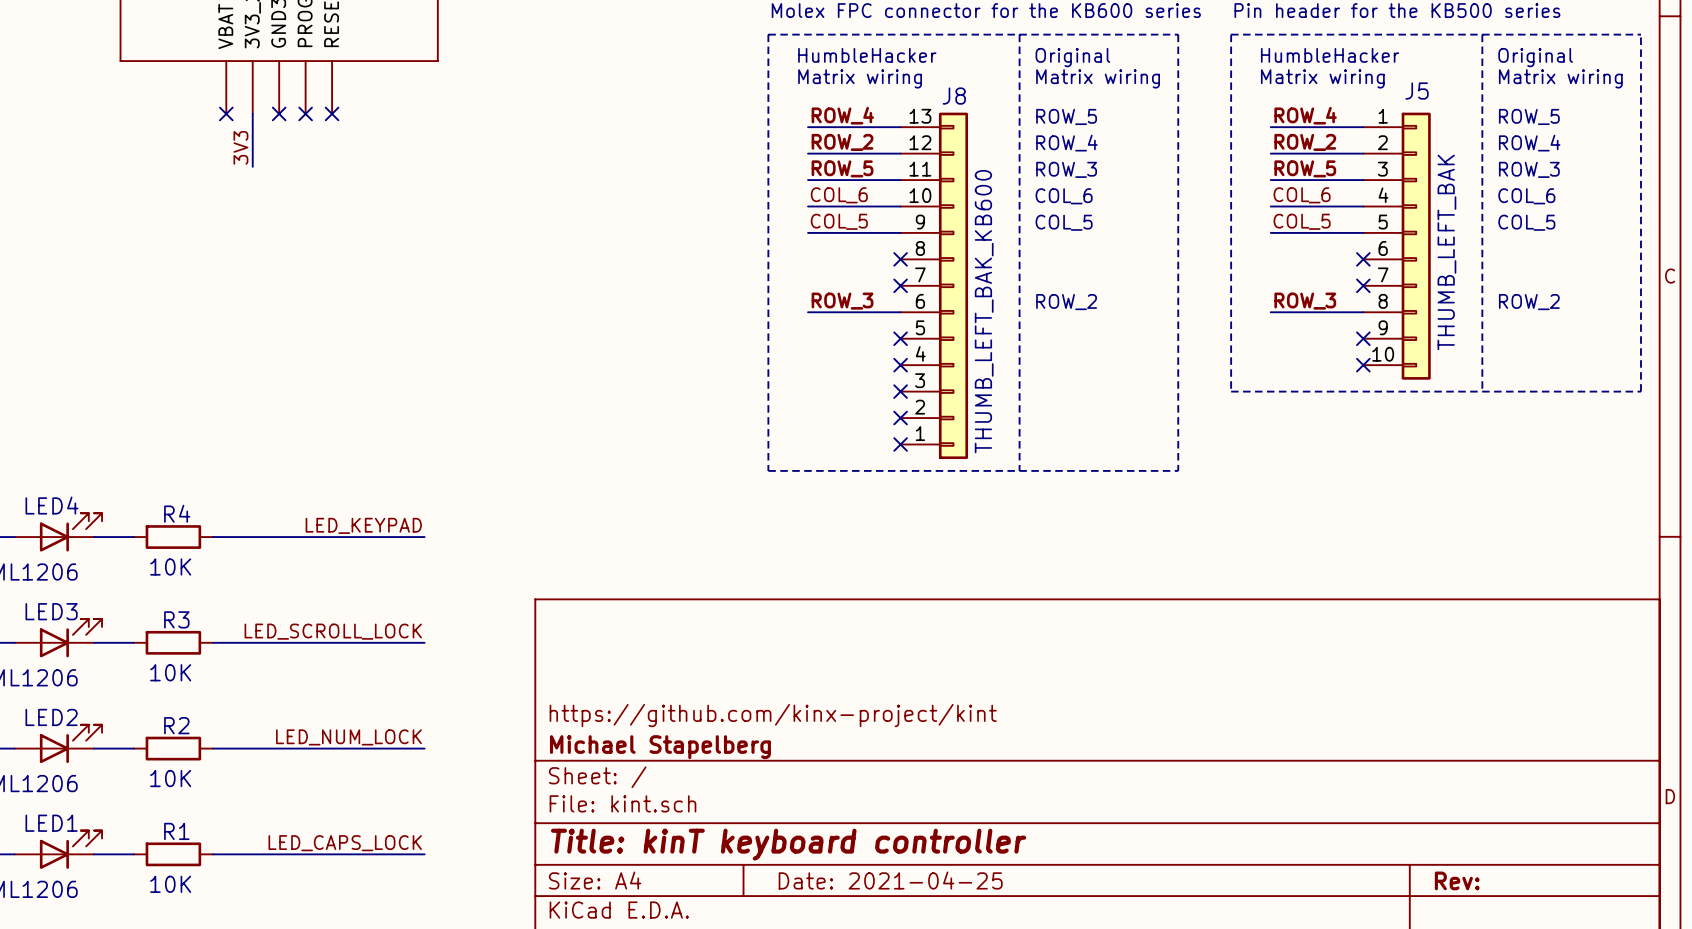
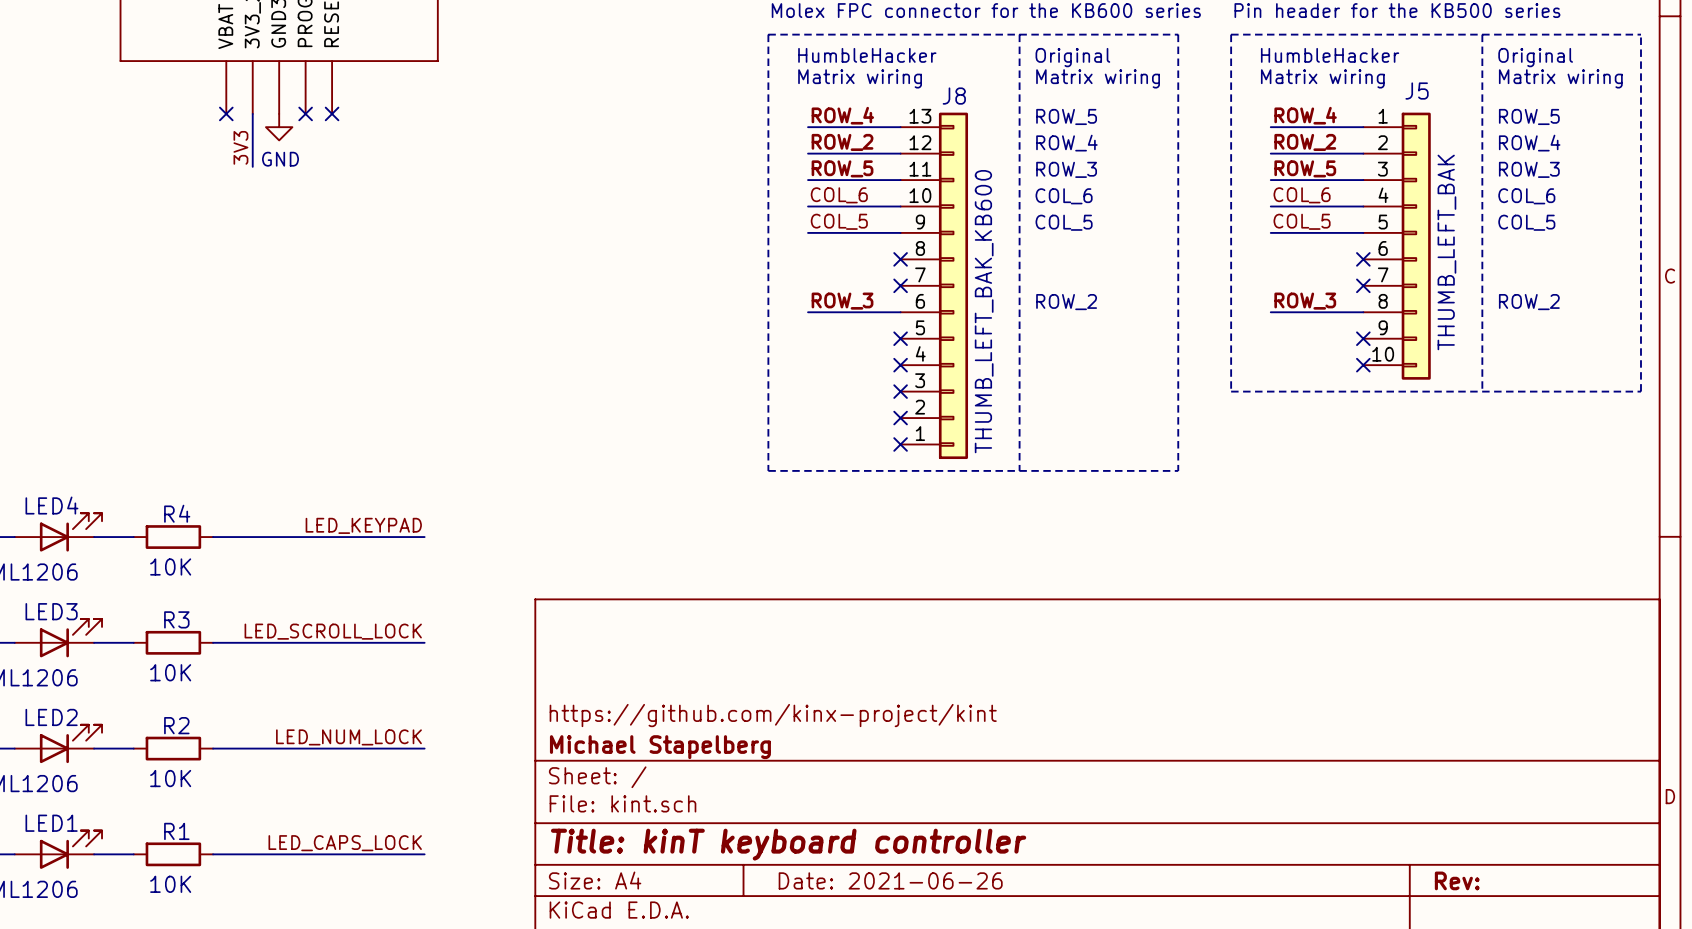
no-connect mark: (279, 113) -> none
power symbol: none -> GND (279, 127)
title block: Date: 2021-04-25 (890, 880) -> Date: 2021-06-26 (890, 880)

